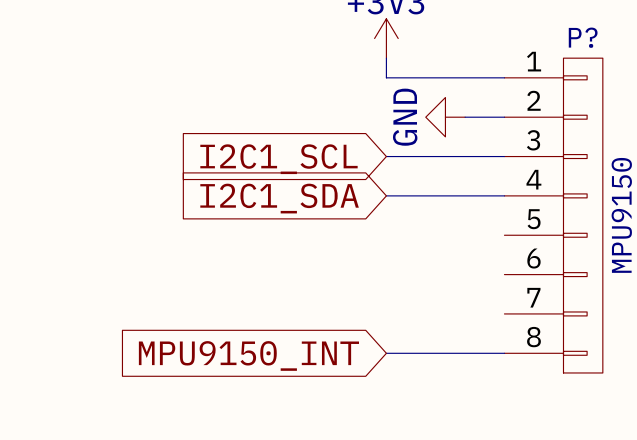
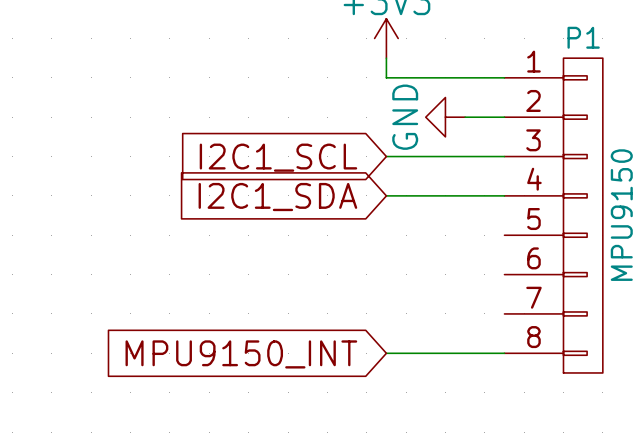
P? name: P? (583, 37) -> P1 (583, 37)

